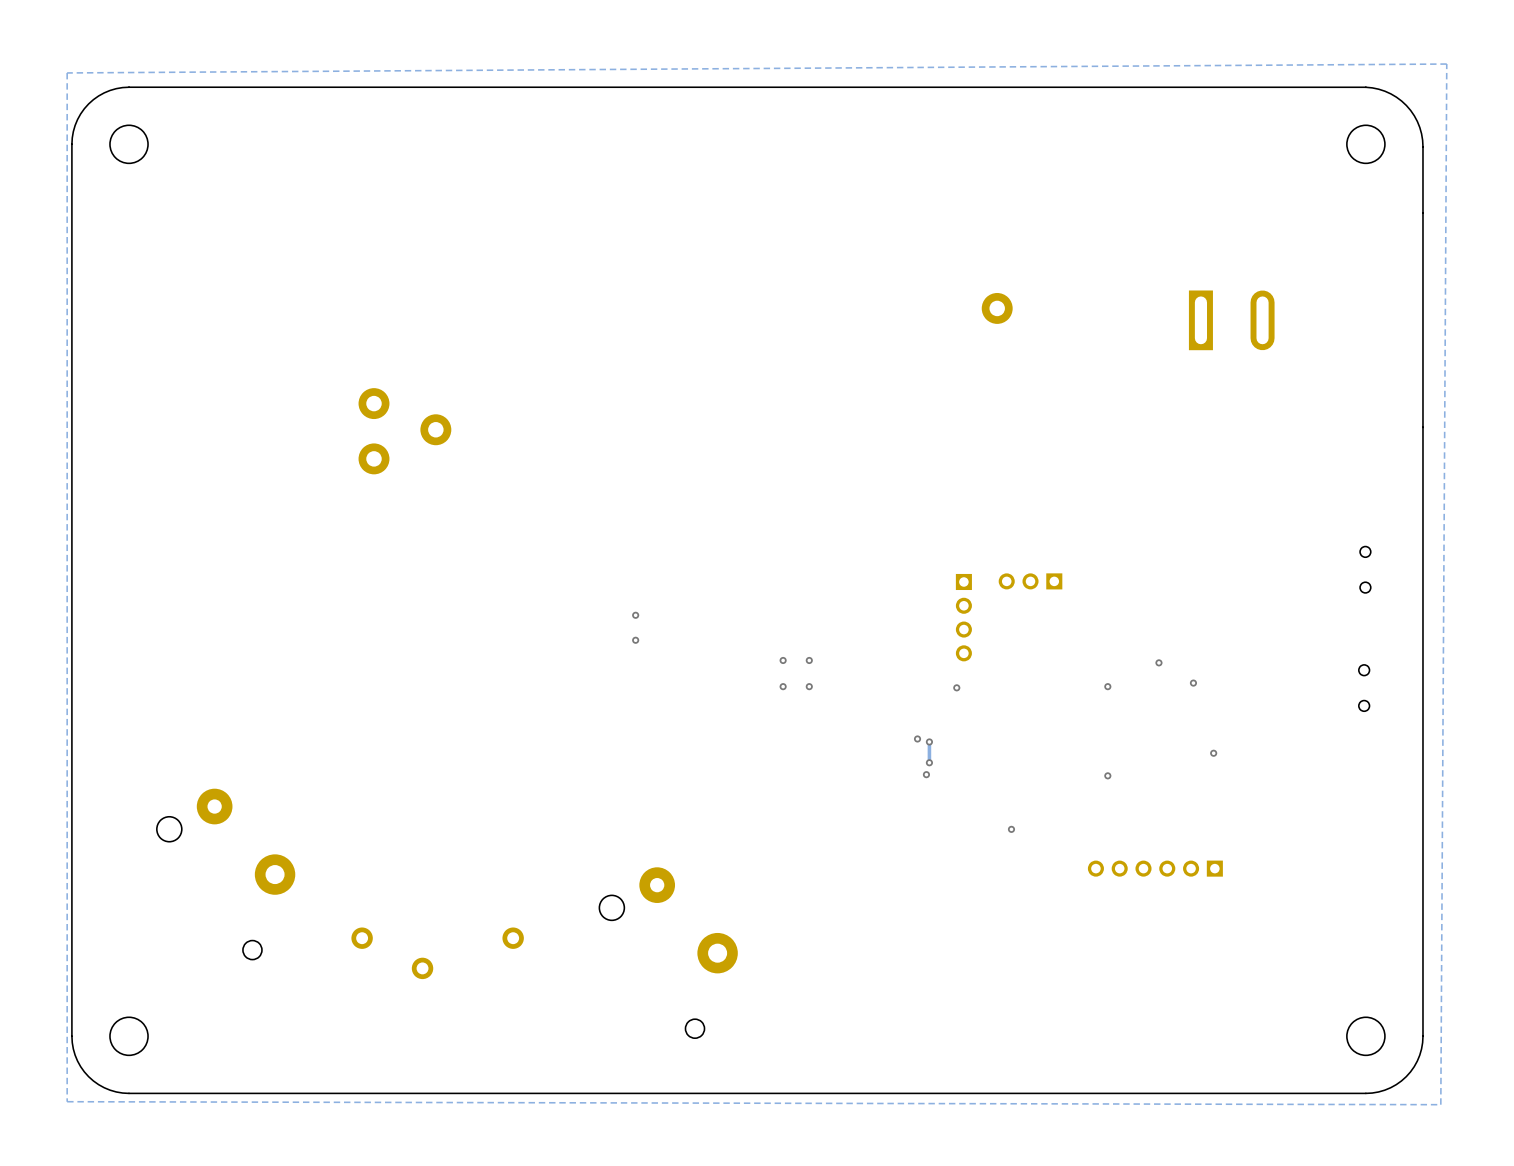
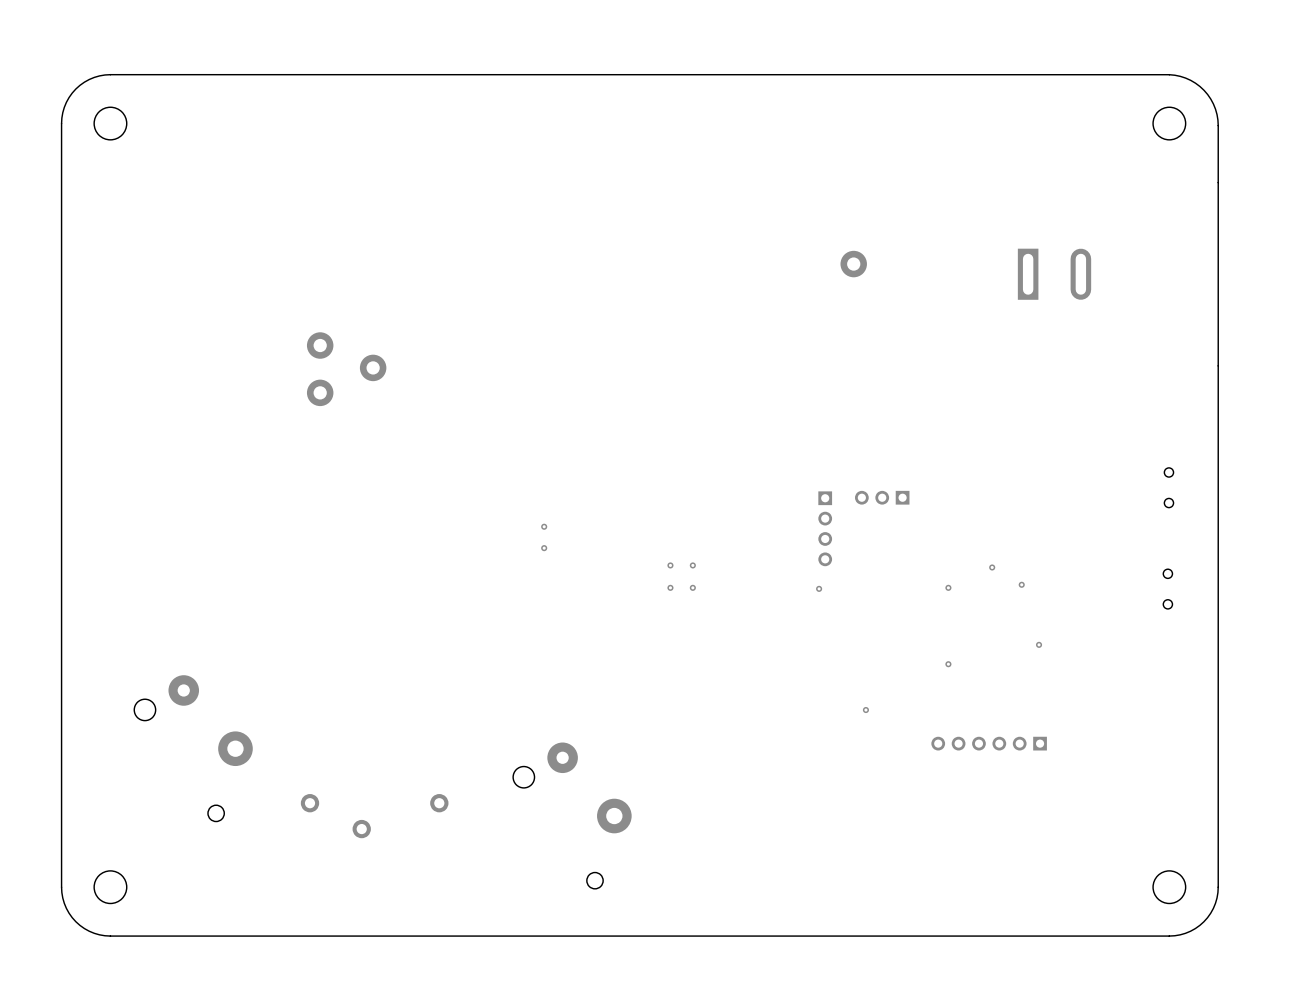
zone outline: (1446, 64) (67, 72) (67, 1101) (1440, 1104) (1446, 64) -> none
via: (917, 738) -> none
track: (929, 741) (929, 762) -> none
via: (929, 741) -> none
via: (929, 762) -> none
via: (926, 774) -> none

